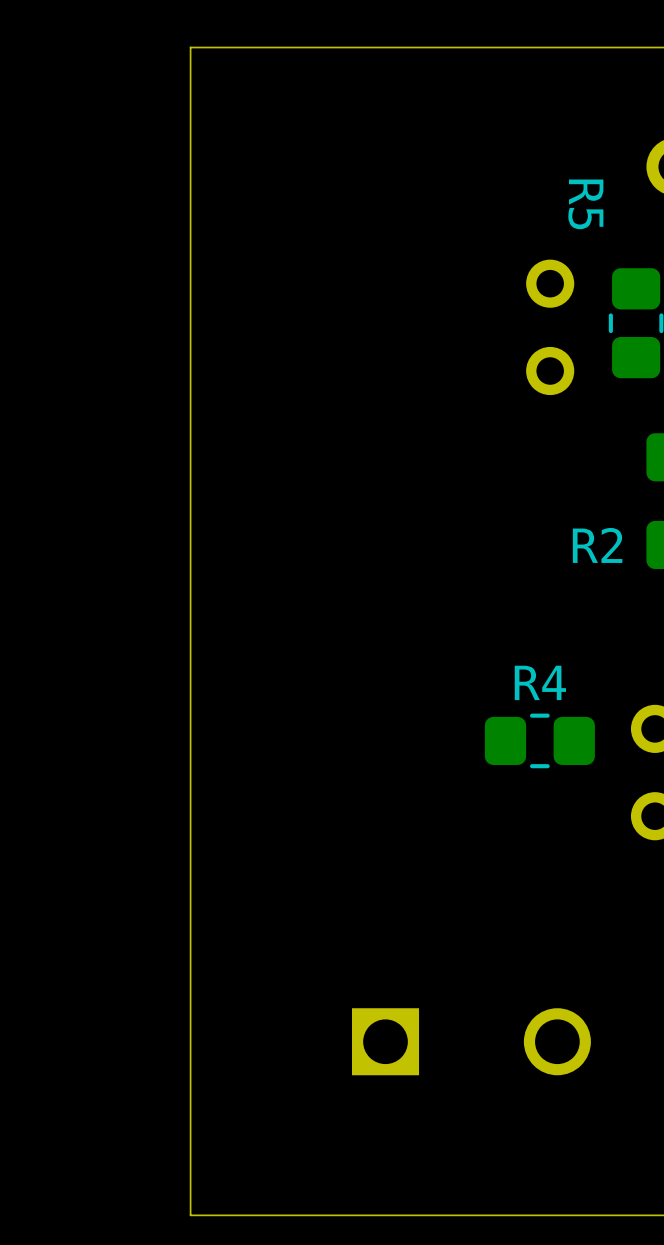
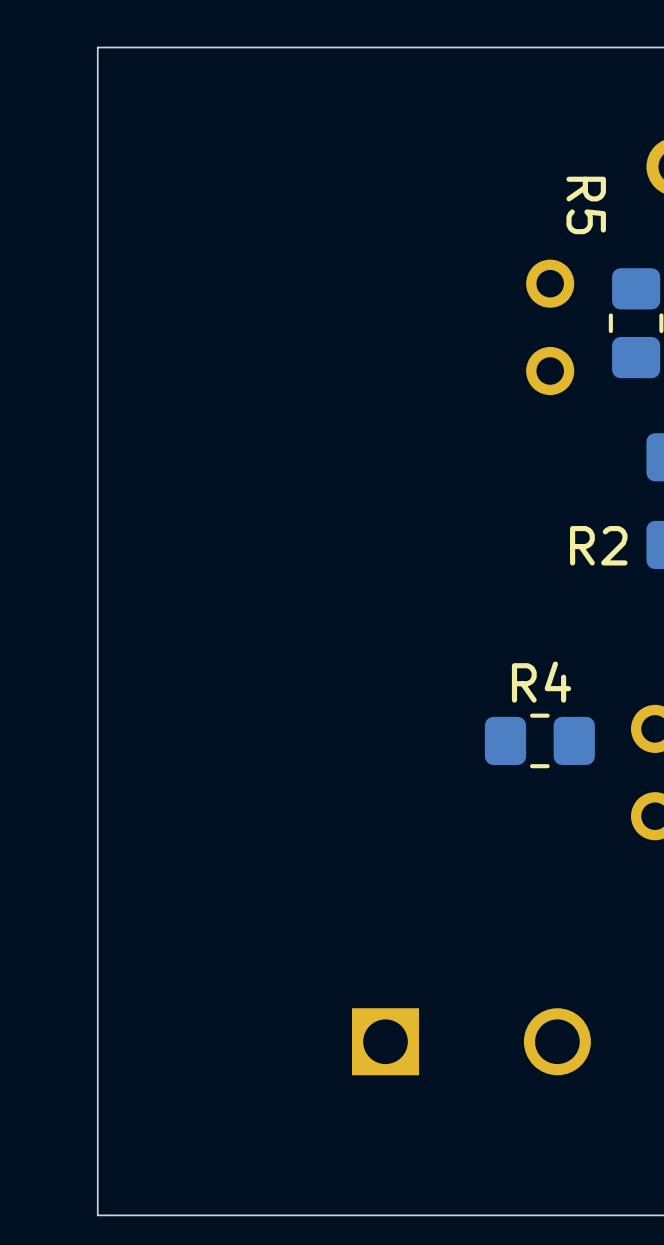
board edge: (190, 47) (190, 1215) -> (190, 47) (97, 47) (97, 1215) (190, 1215)

